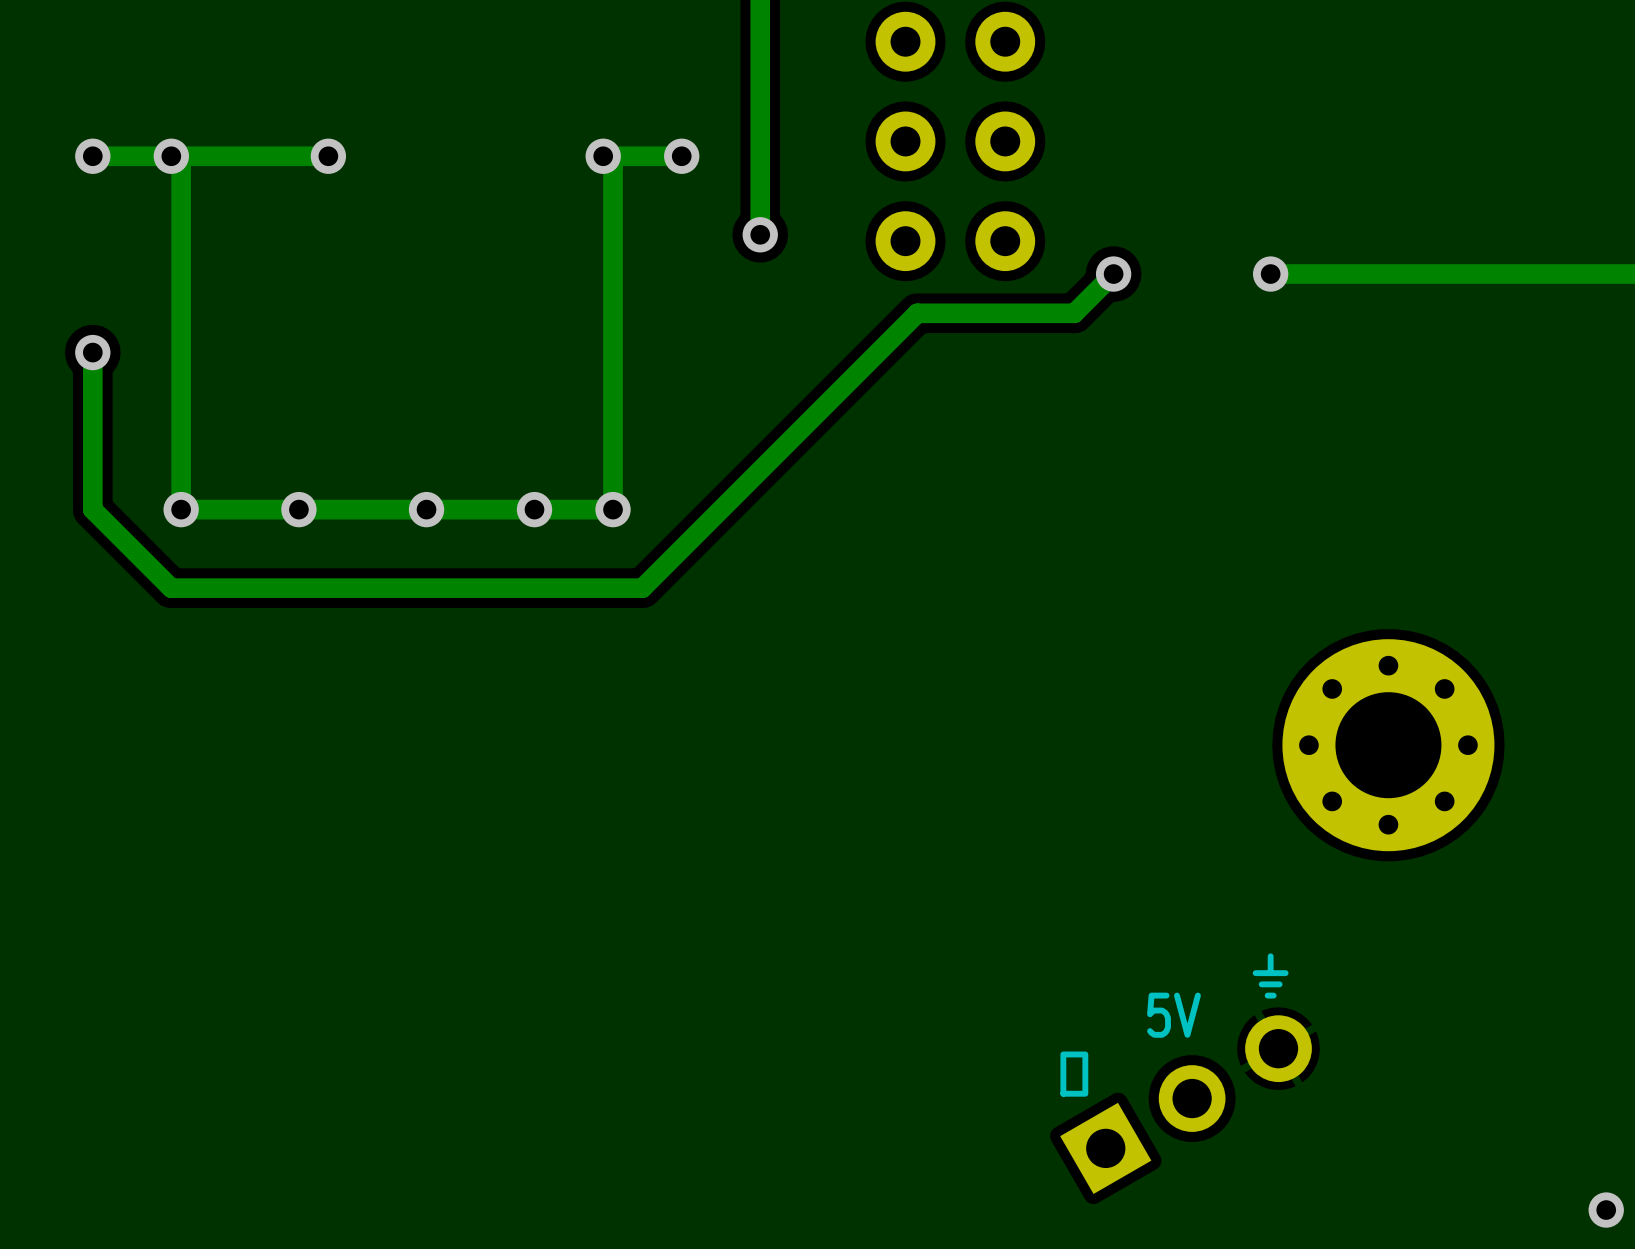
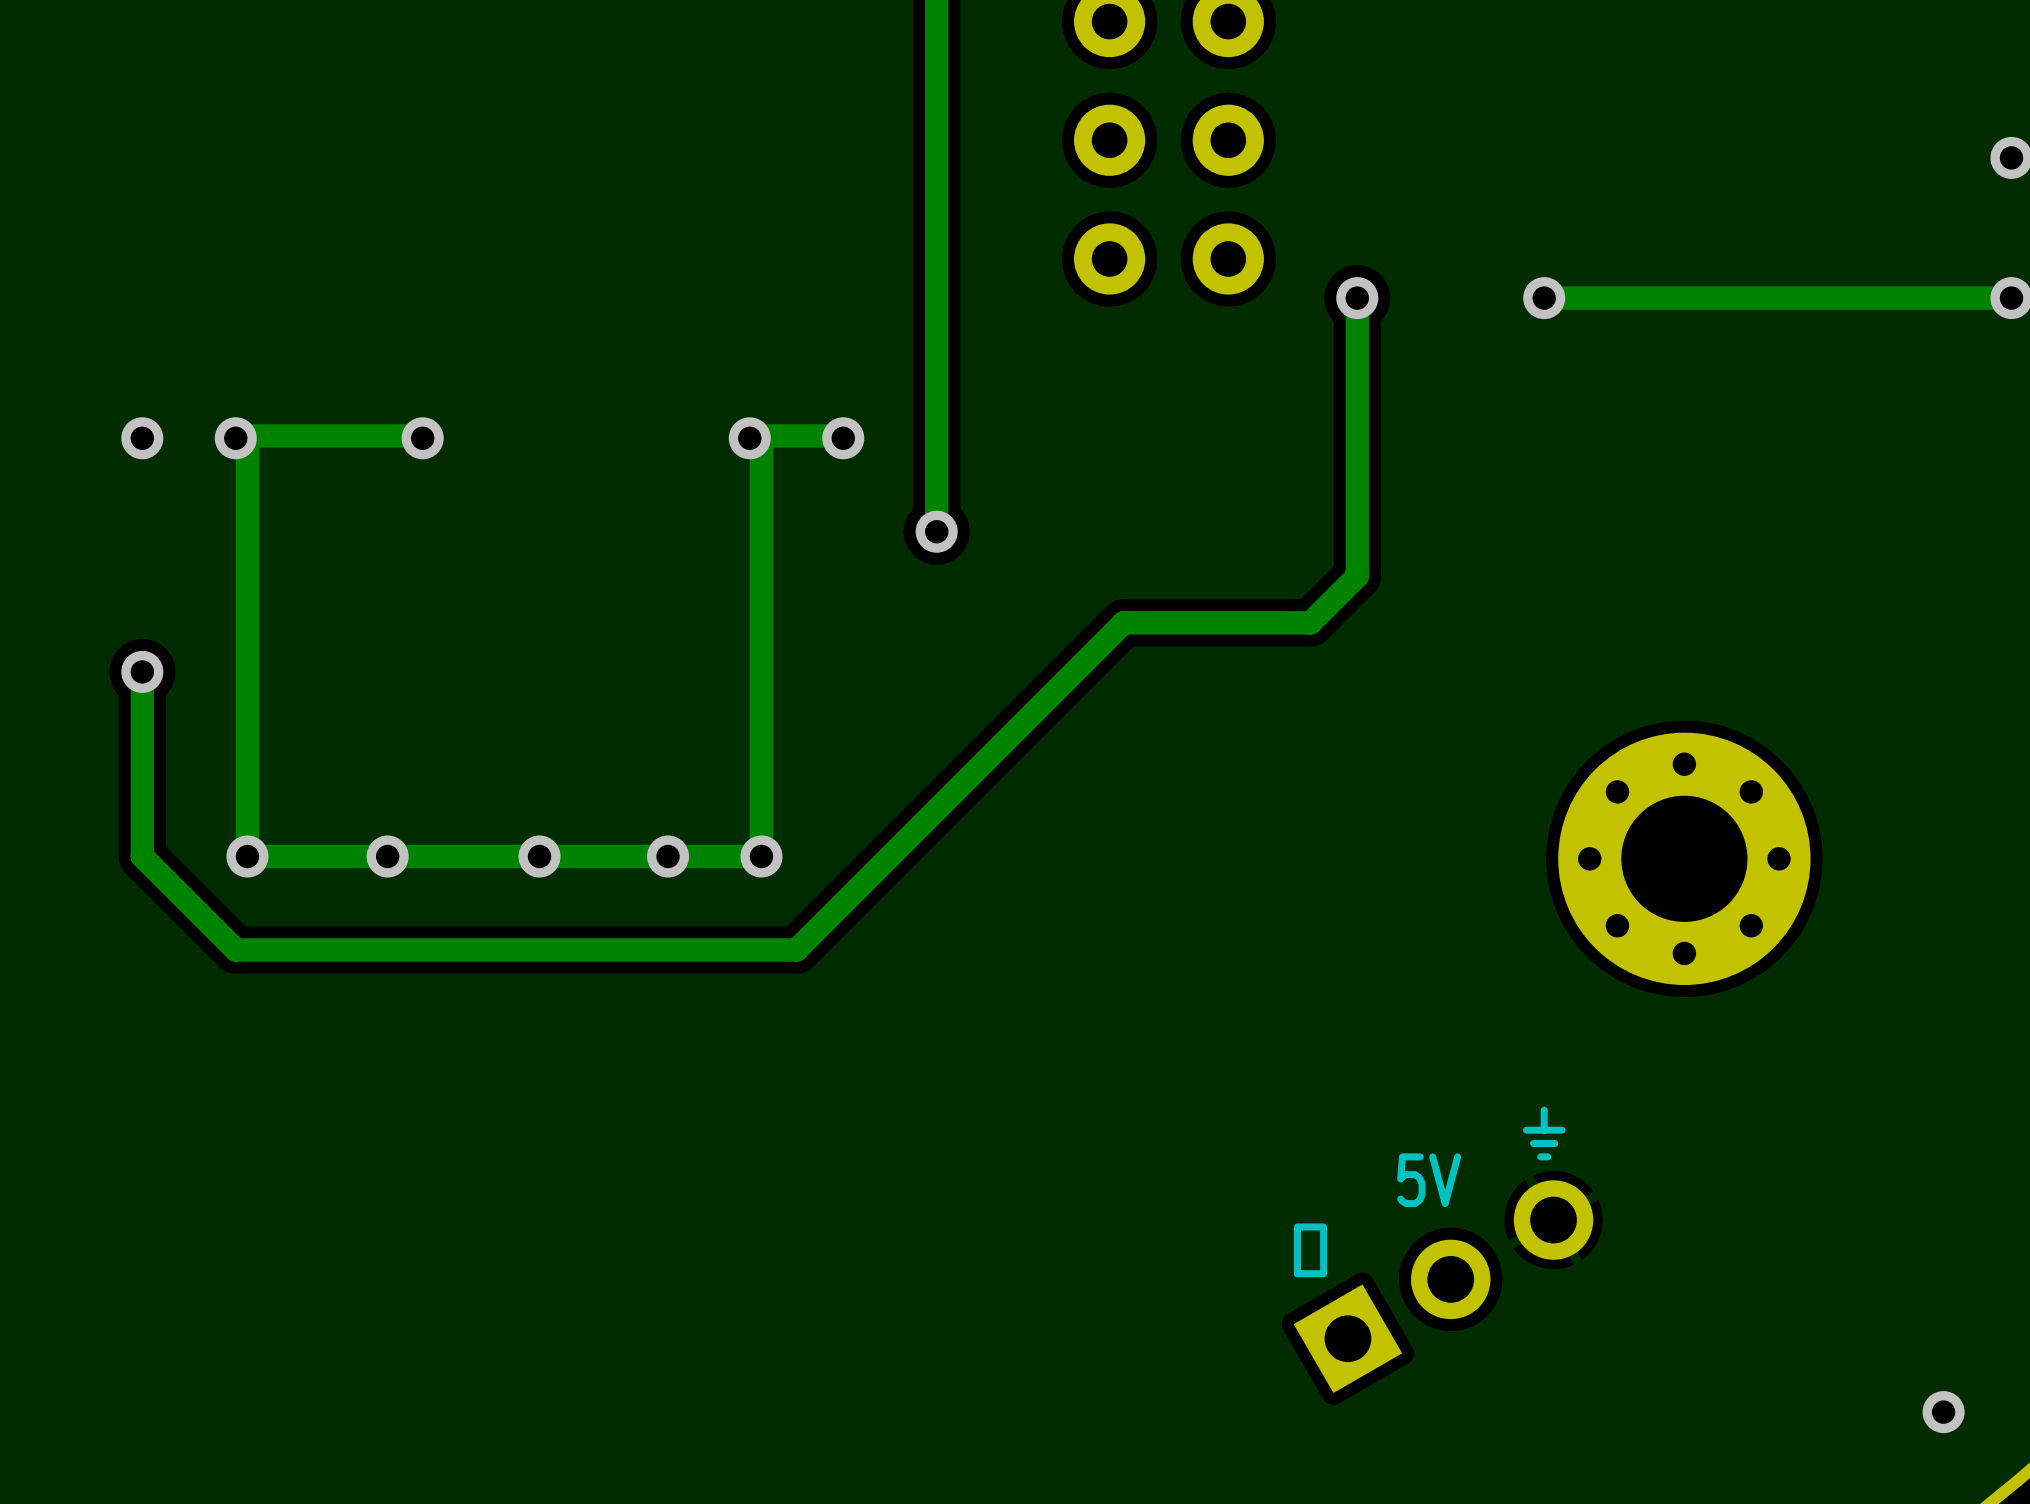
via: (92, 156) -> none
track: (171, 156) (181, 166) (181, 399) -> (422, 435) (235, 435) (247, 447)
via: (171, 156) -> none
track: (328, 156) (92, 156) -> none
via: (328, 156) -> none
via: (603, 156) -> none
track: (681, 156) (603, 156) (613, 166) (613, 399) -> (843, 435) (749, 435) (761, 447)
via: (681, 156) -> none
track: none -> (936, 251) (936, 529)
via: (760, 234) -> none
track: (1113, 274) (1074, 313) (917, 313) (642, 588) (171, 588) (92, 509) (92, 352) -> (1357, 298) (1357, 576) (1310, 622) (1123, 622) (796, 949) (235, 949) (142, 856) (142, 671)
via position: (92, 352) -> (142, 438)
via: none -> (235, 438)
via: none -> (422, 438)
via: none -> (749, 438)
via: none -> (843, 438)
via: none -> (936, 531)
via: (181, 509) -> none
via: (298, 509) -> none
via: (426, 509) -> none
via: (534, 509) -> none
track: (613, 509) (181, 509) -> (761, 578) (761, 856) (247, 856) (247, 578)
via: (613, 509) -> none
via: none -> (142, 671)
via: none -> (247, 856)
via: none -> (387, 856)
via: none -> (539, 856)
via: none -> (668, 856)
via: none -> (761, 856)

